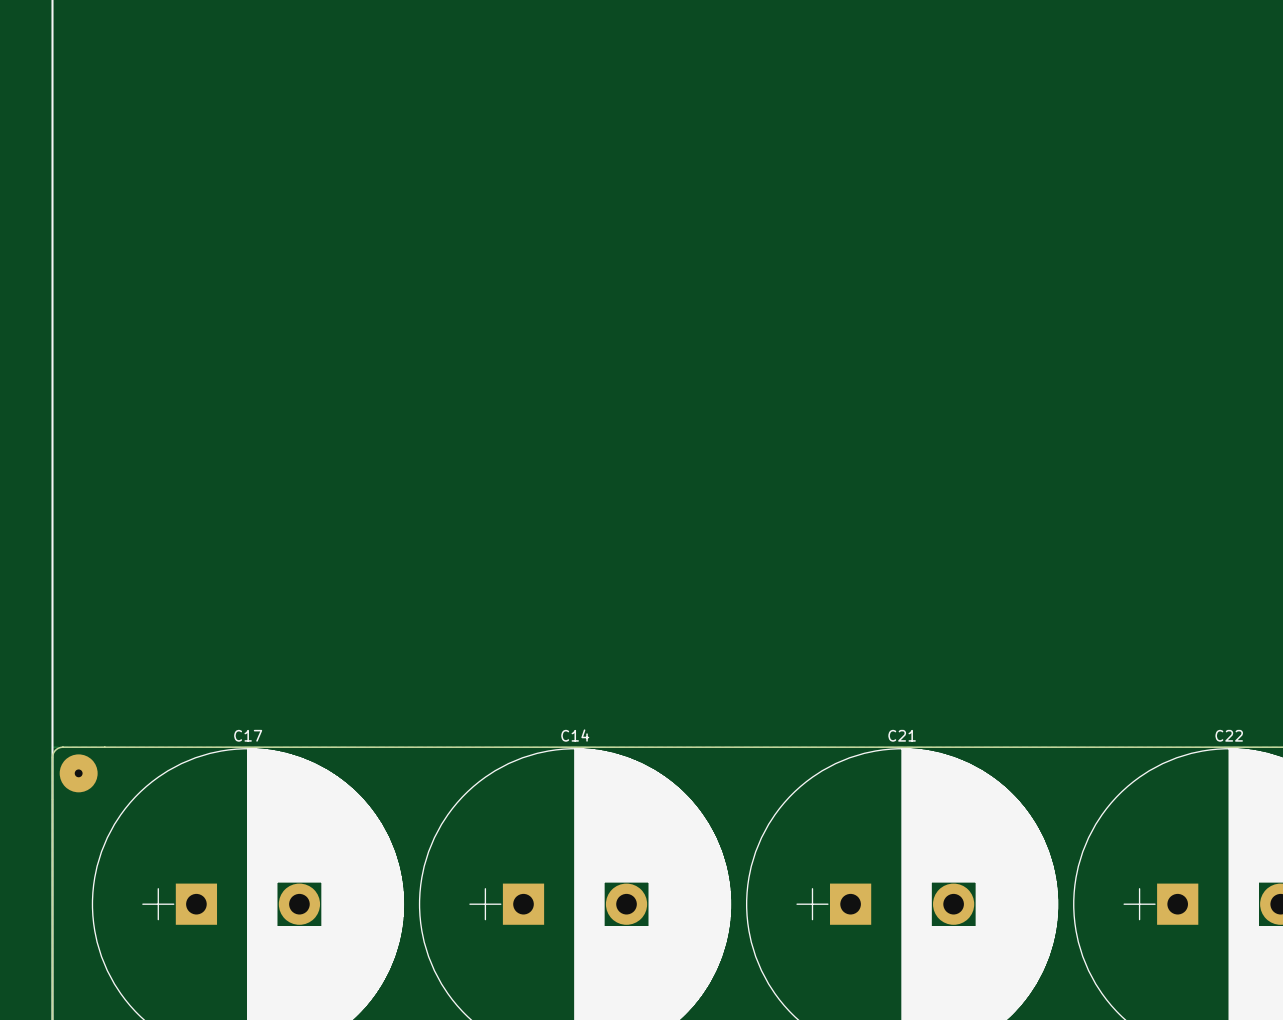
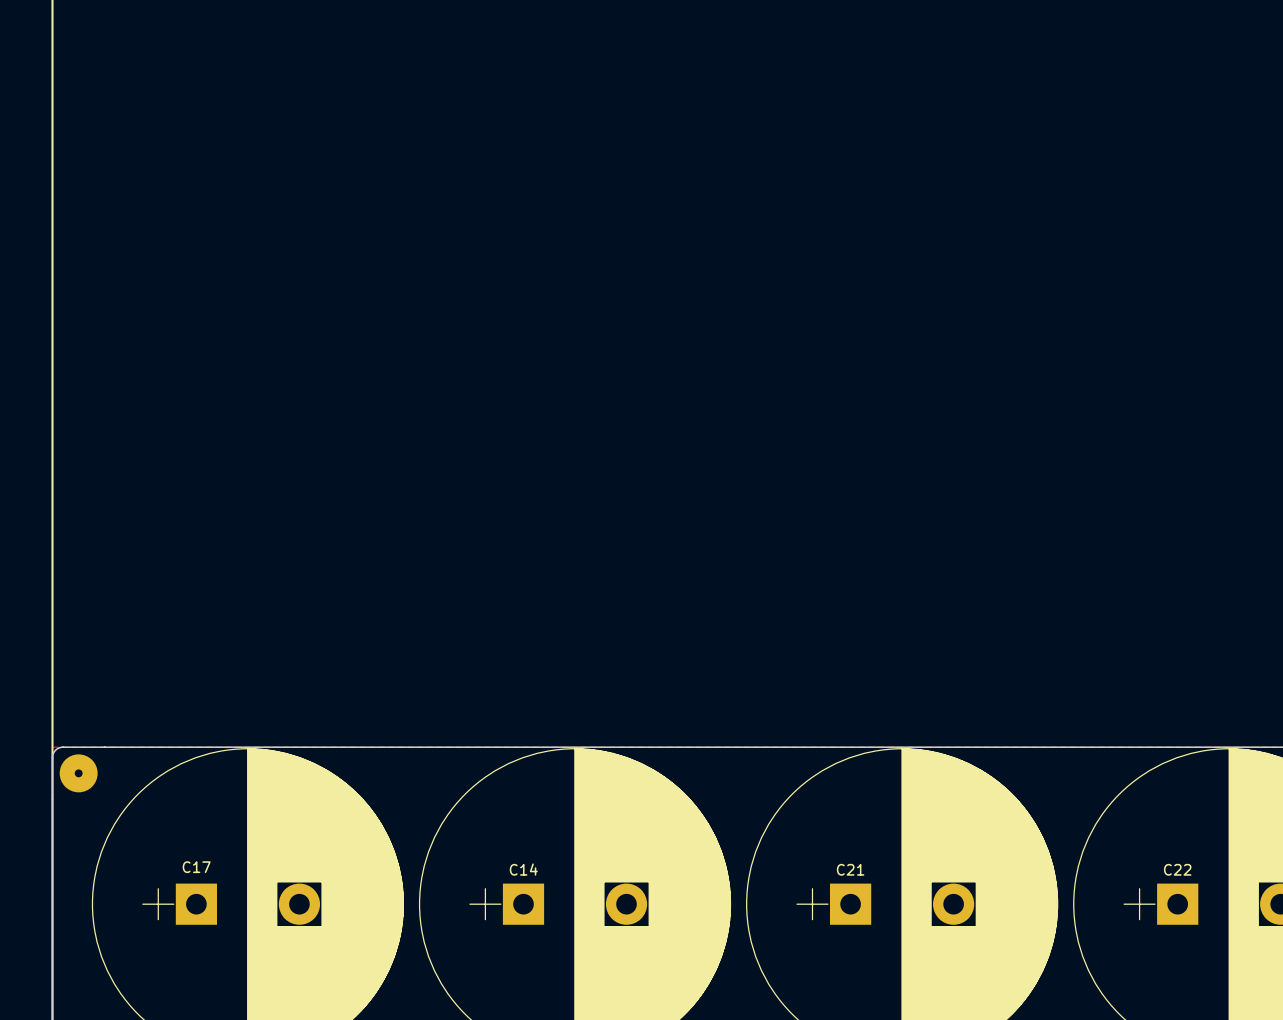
C17 name position: C17 (248, 735) -> C17 (196, 867)
C14 name position: C14 (575, 735) -> C14 (523, 869)
C21 name position: C21 (902, 735) -> C21 (850, 869)
C22 name position: C22 (1229, 735) -> C22 (1177, 869)

